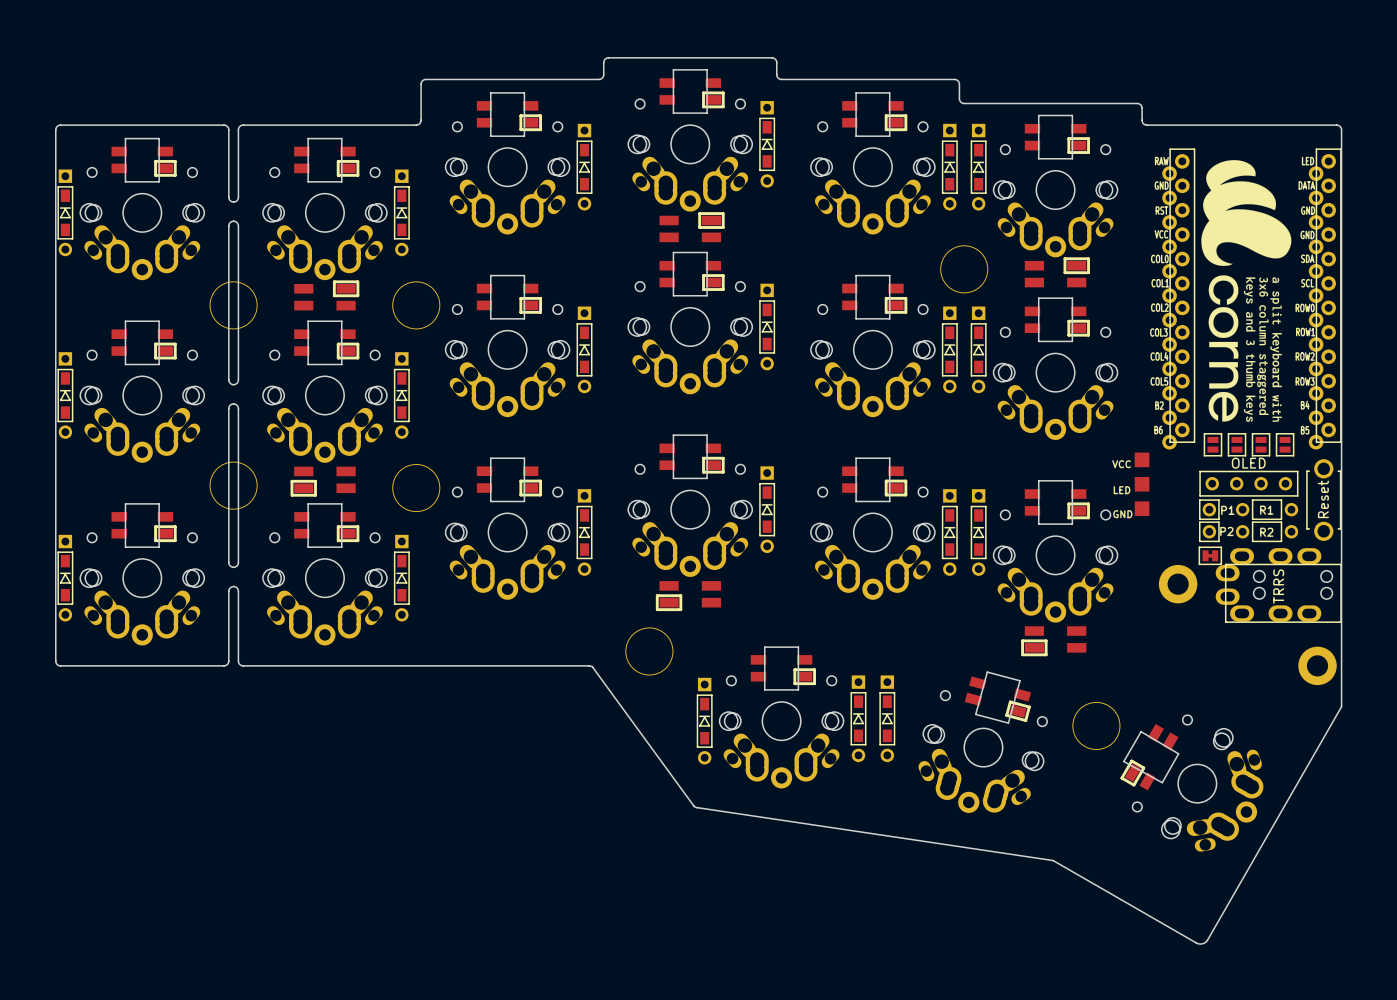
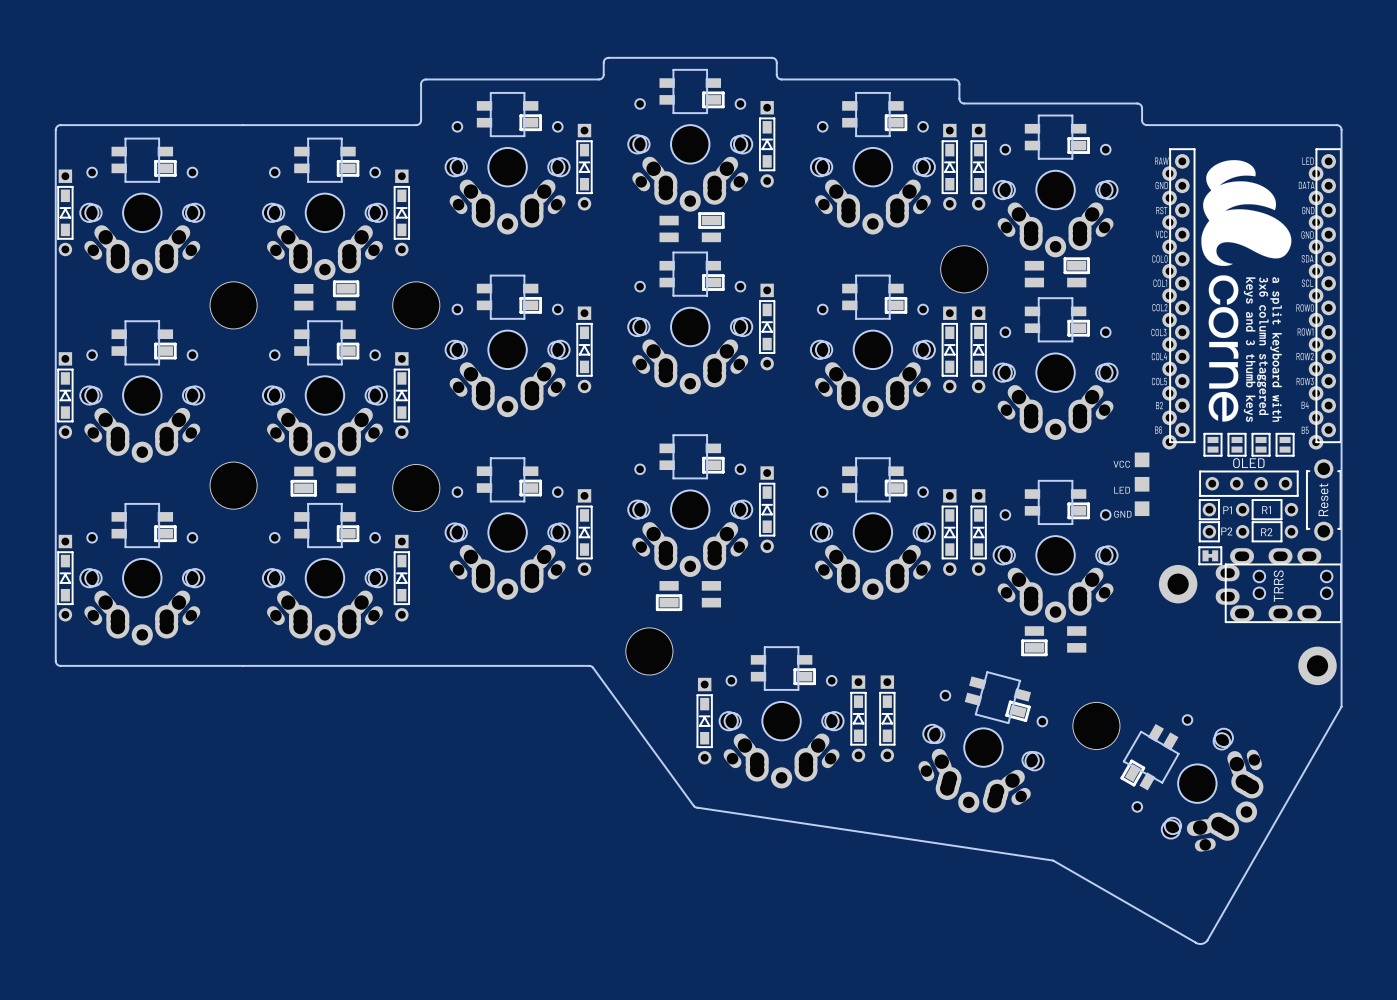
board edge: (224, 125) (228, 129) (228, 197) (233, 202) (238, 197) (238, 129) (243, 125) -> (224, 125) (243, 125)
board edge: (233, 221) (238, 226) (238, 379) (233, 384) (228, 379) (228, 226) (233, 221) -> none
board edge: (233, 403) (238, 408) (238, 562) (233, 567) (228, 562) (228, 408) (233, 403) -> none
board edge: (224, 665) (228, 661) (228, 591) (233, 586) (238, 591) (238, 661) (243, 665) -> (224, 665) (243, 665)

